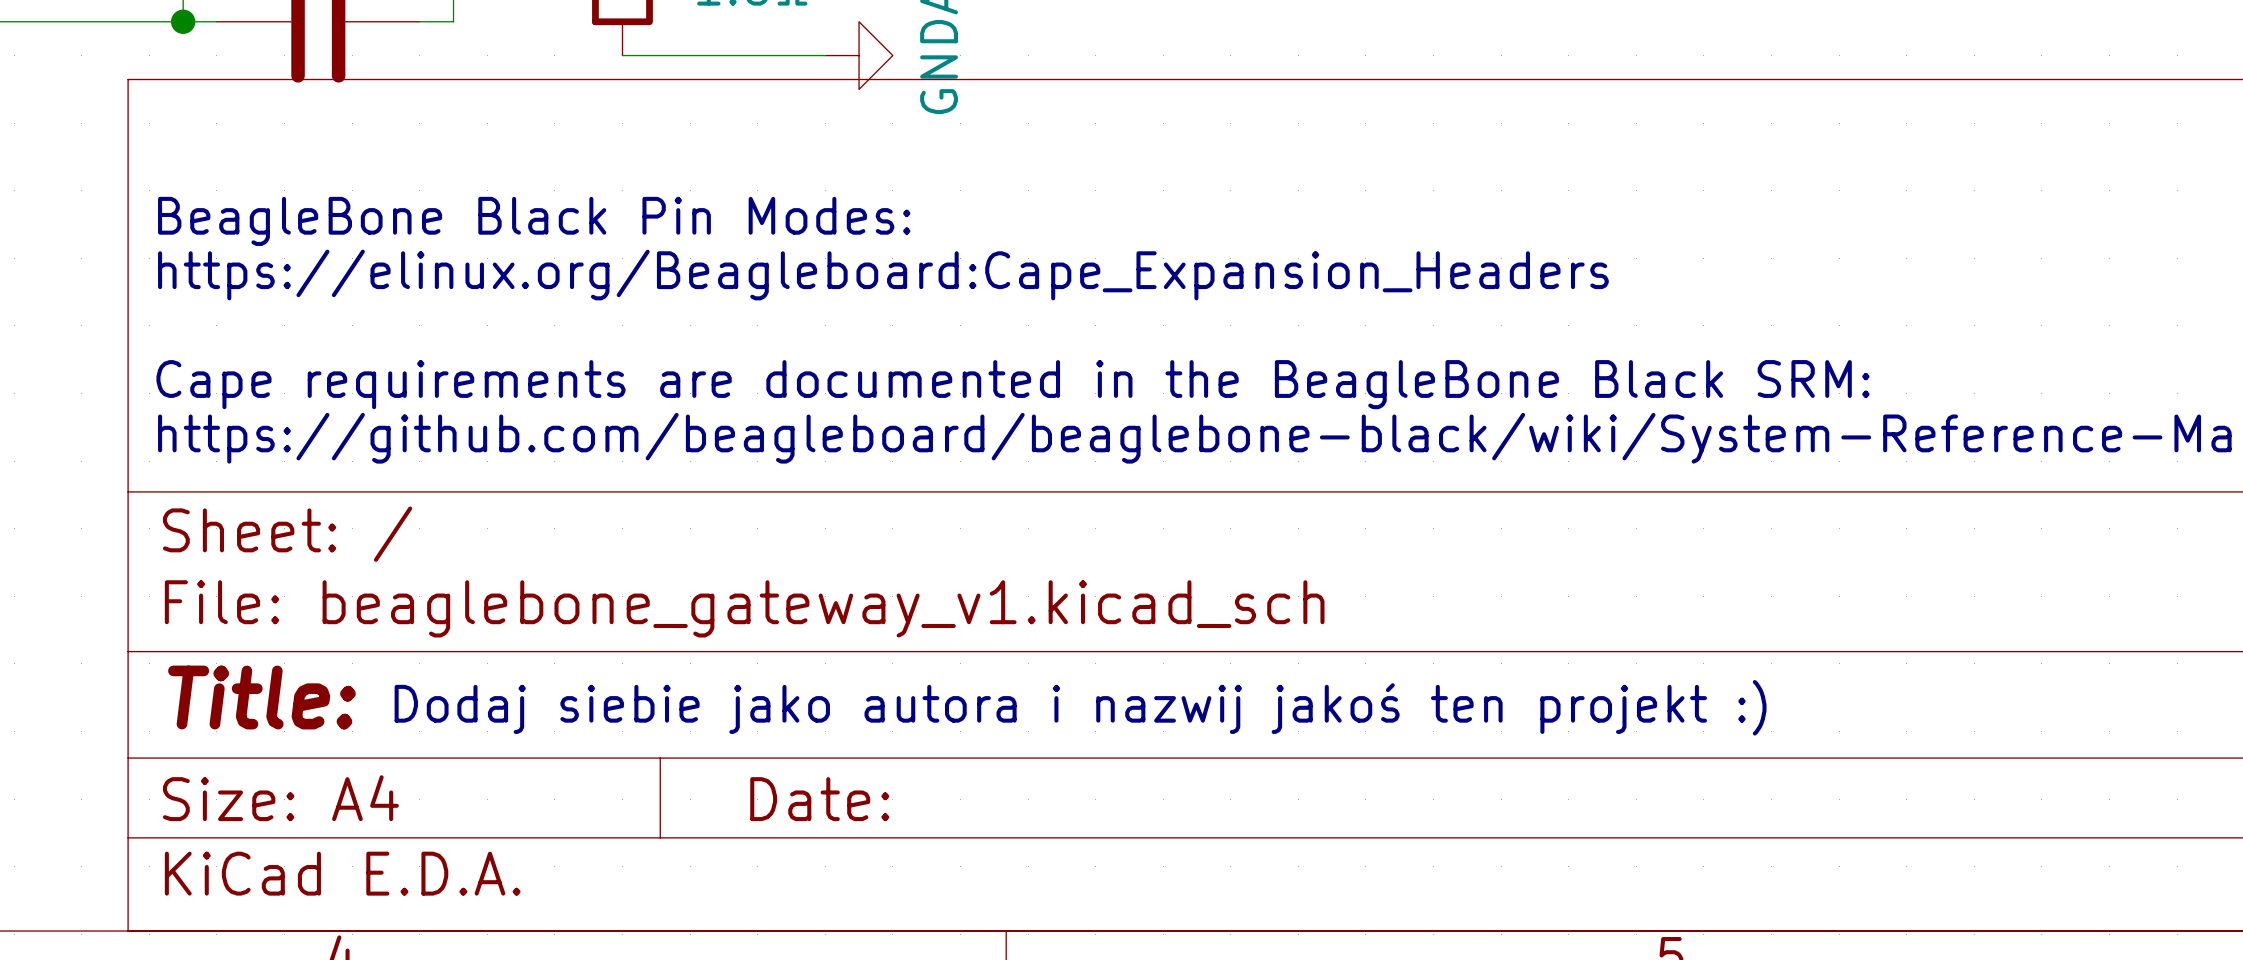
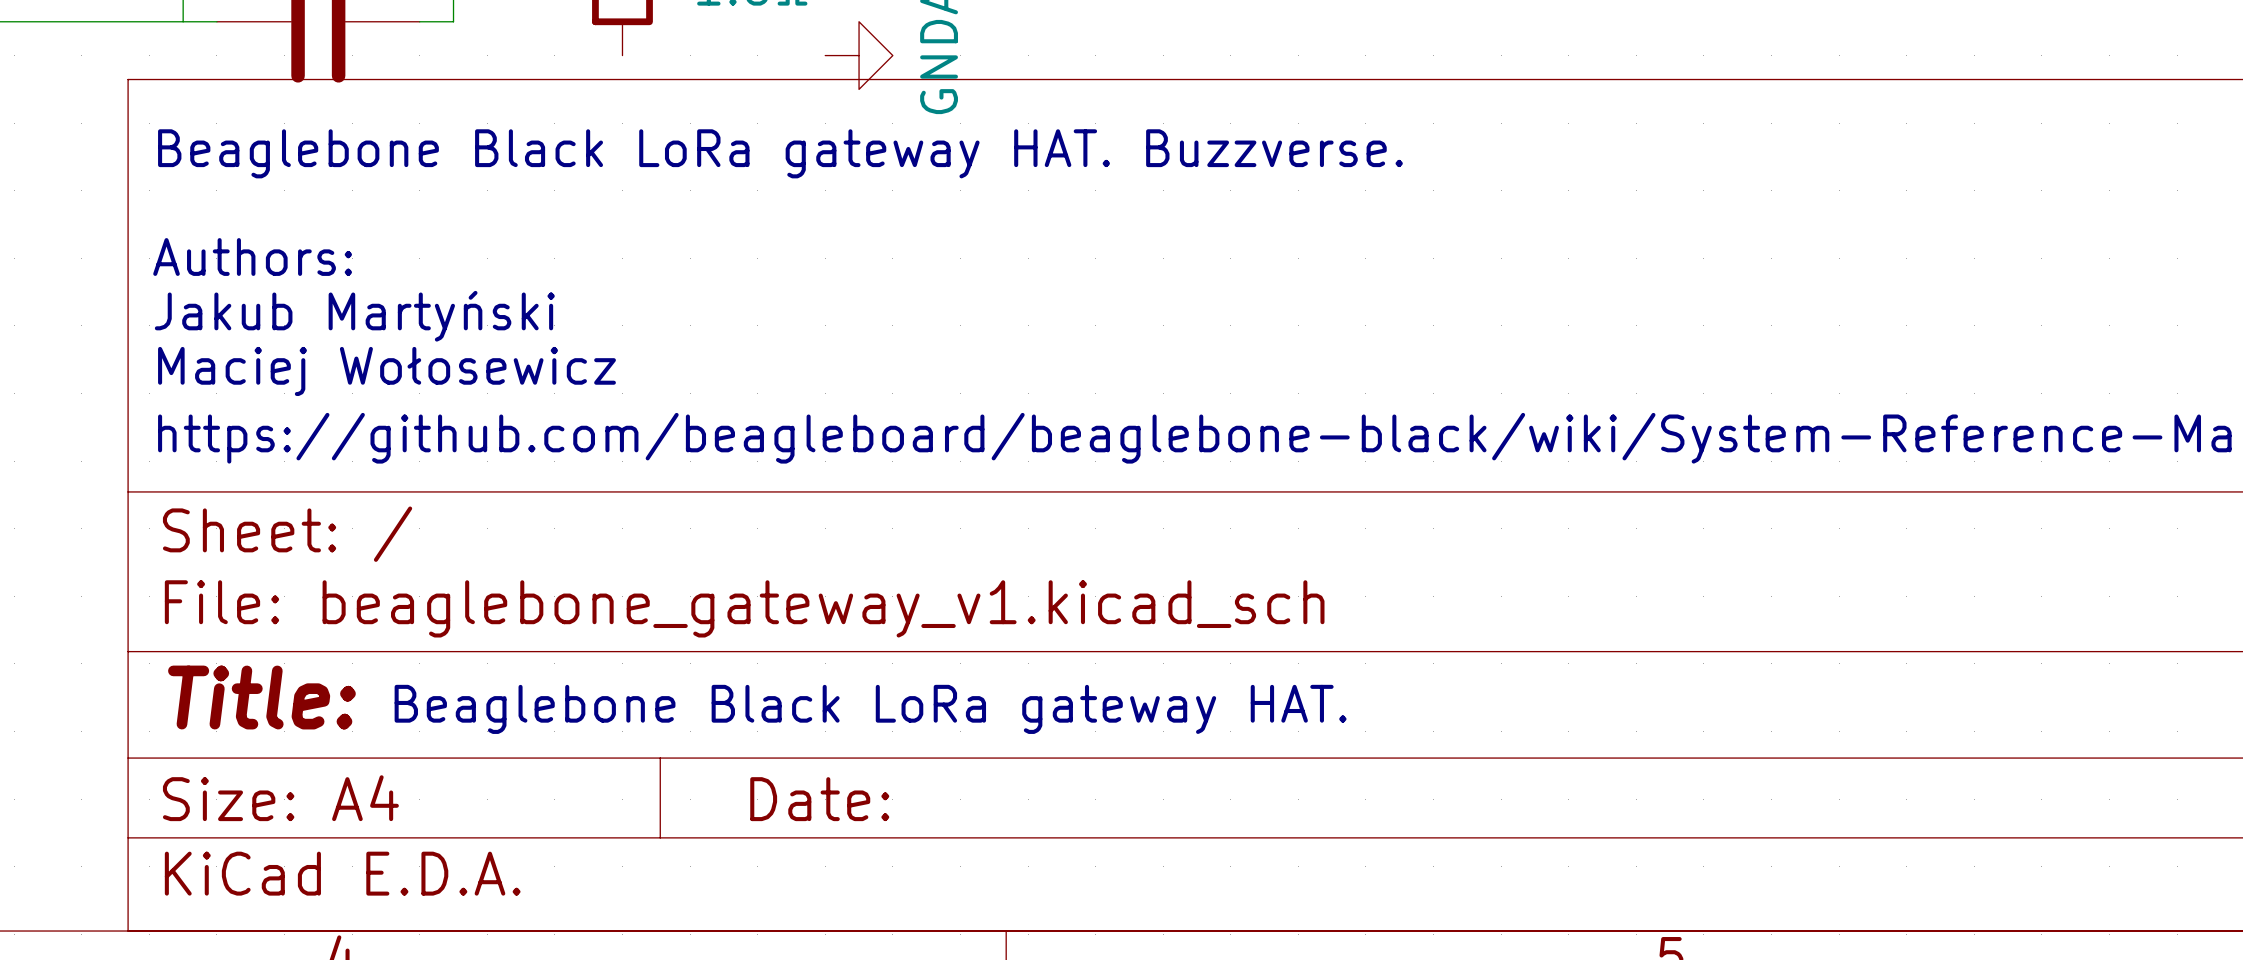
junction: (183, 21) -> none
wire: (622, 55) (825, 55) -> none
text: none -> Beaglebone Black LoRa gateway HAT. Buzzverse. (780, 153)
text: BeagleBone Black Pin Modes: (534, 221) -> none
text: https://elinux.org/Beagleboard:Cape_Expansion_Headers (883, 275) -> Authors: (252, 257)
text: none -> Jakub Martyński (354, 316)
text: Cape requirements are documented in the BeagleBone Black SRM: (1012, 384) -> Maciej Wołosewicz (386, 371)
text: Dodaj siebie jako autora i nazwij jakoś ten projekt :) (1080, 707) -> Beaglebone Black LoRa gateway HAT. (870, 709)

